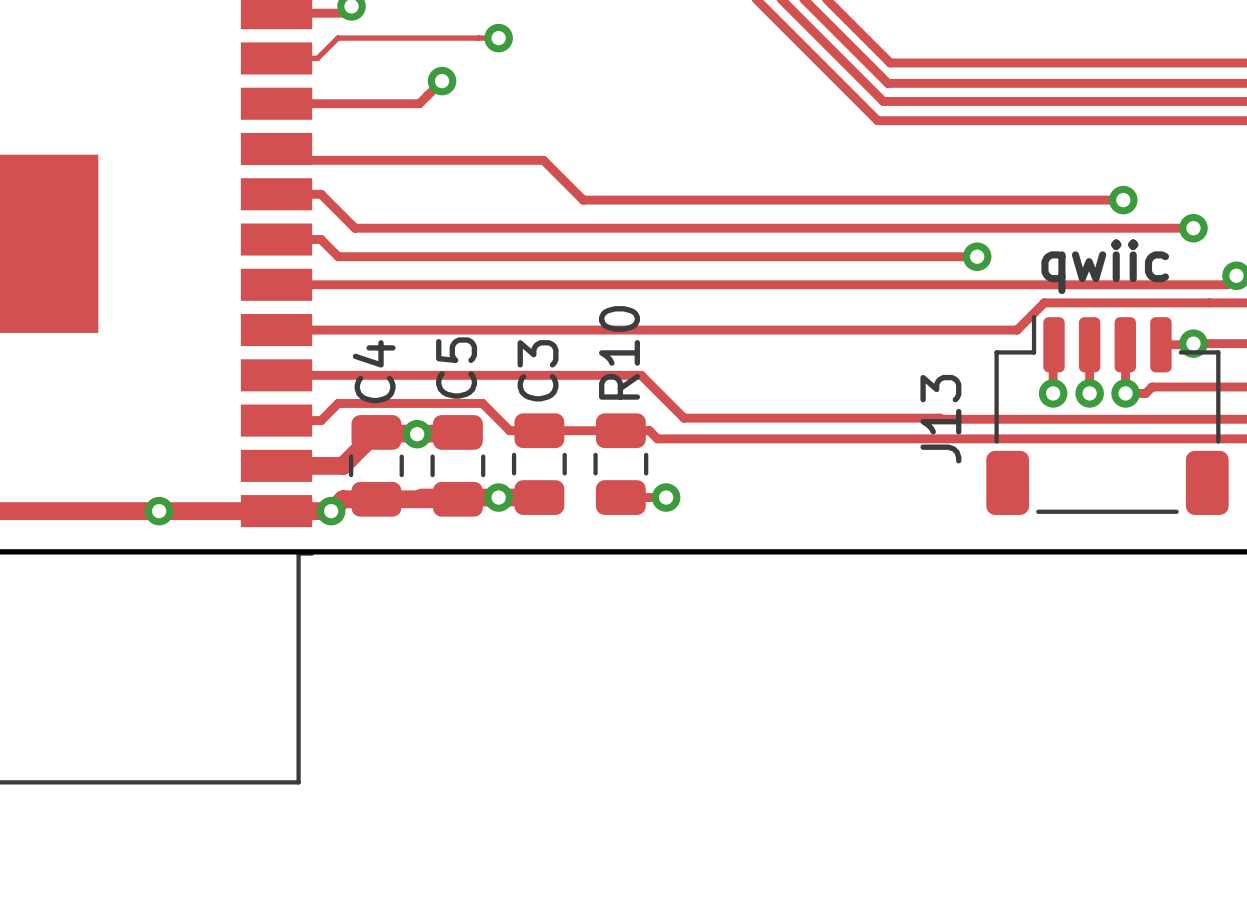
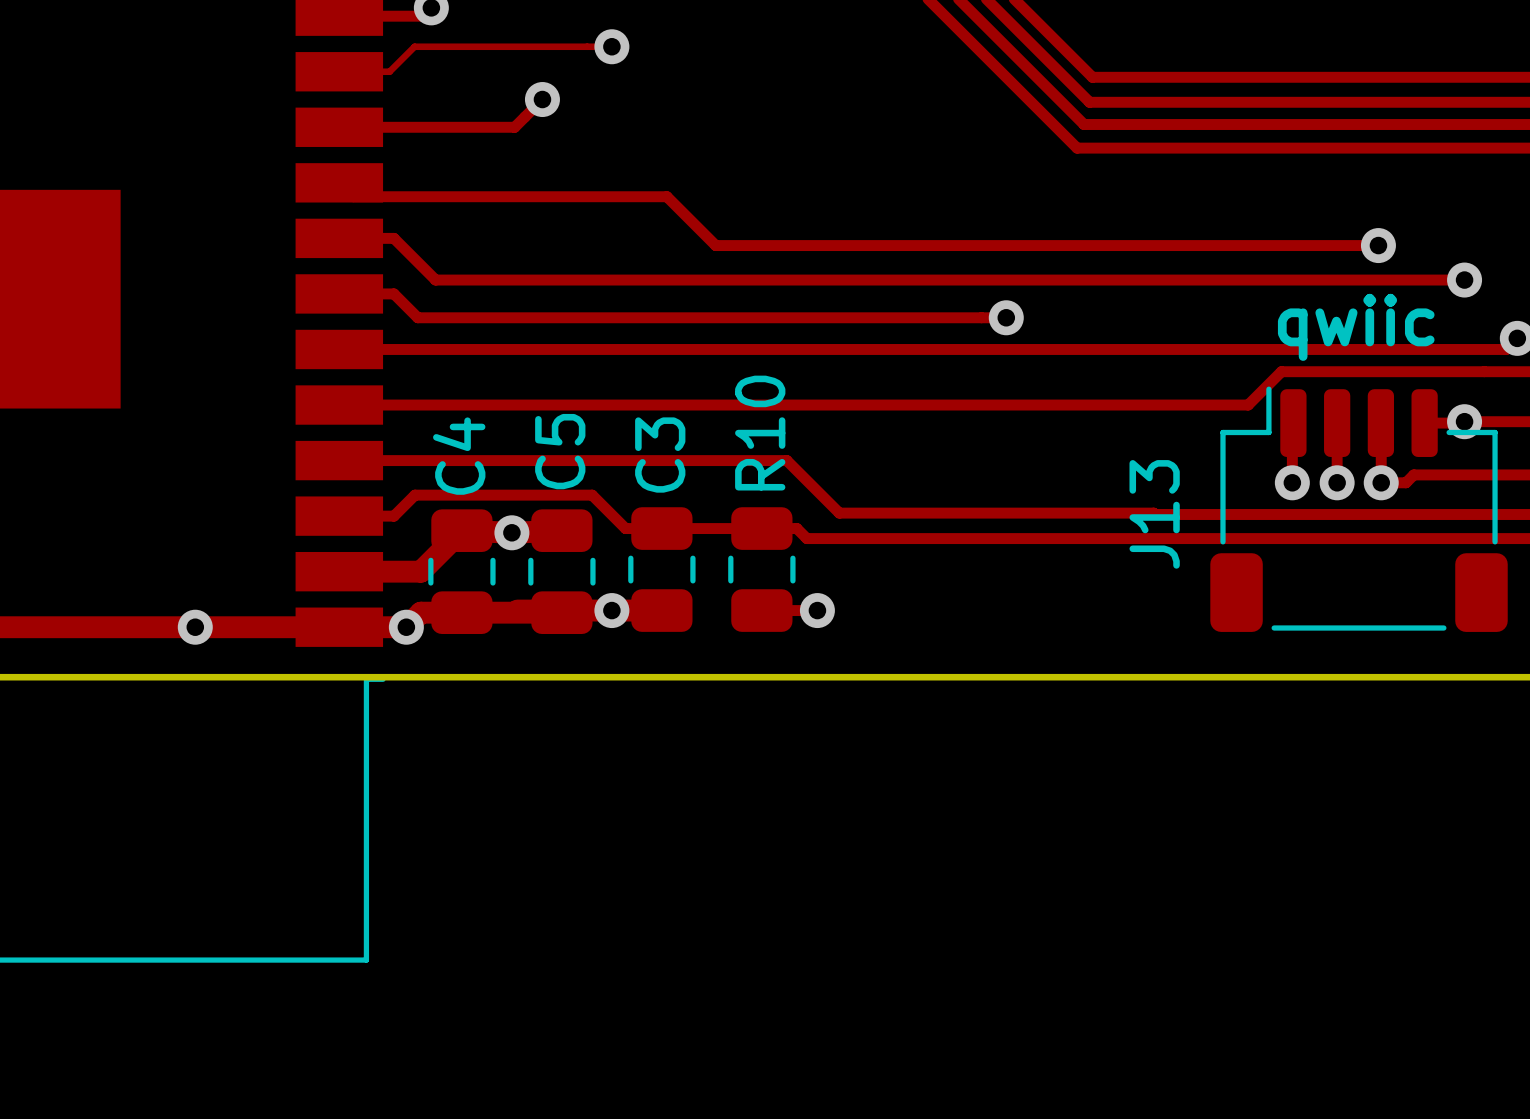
track: (338, 256) (977, 256) -> (415, 315) (417, 317) (1006, 317)
via position: (977, 256) -> (1006, 317)

